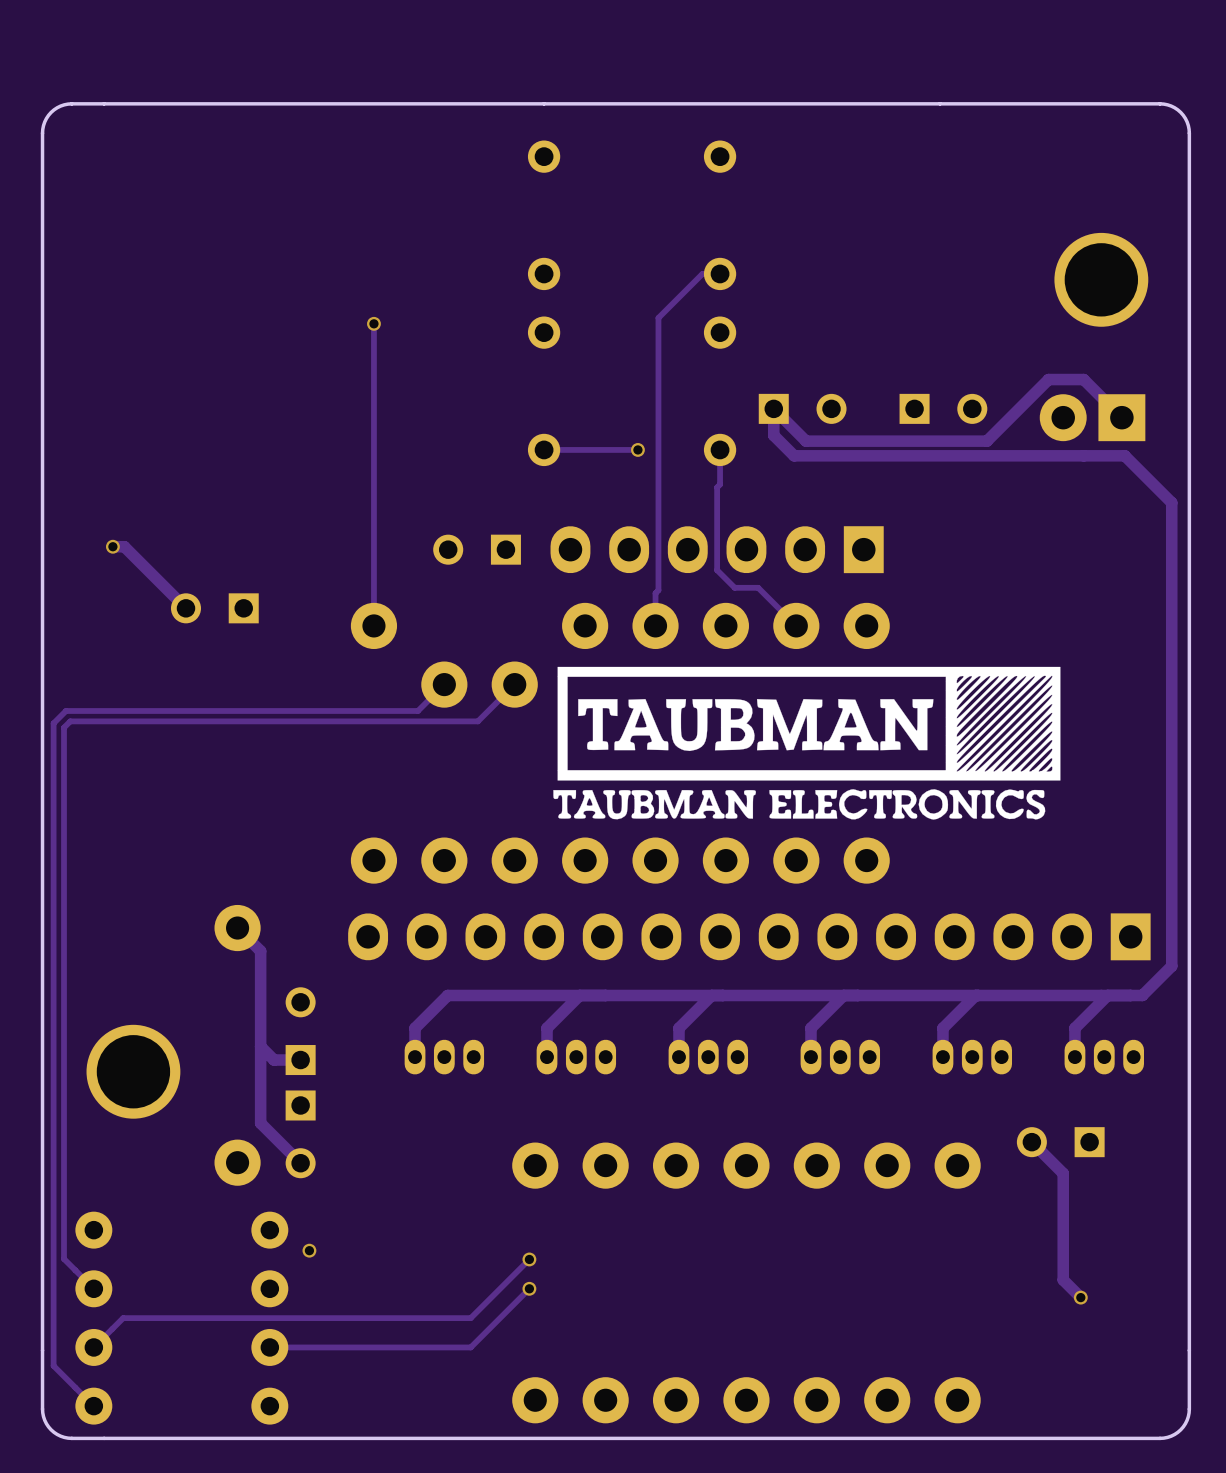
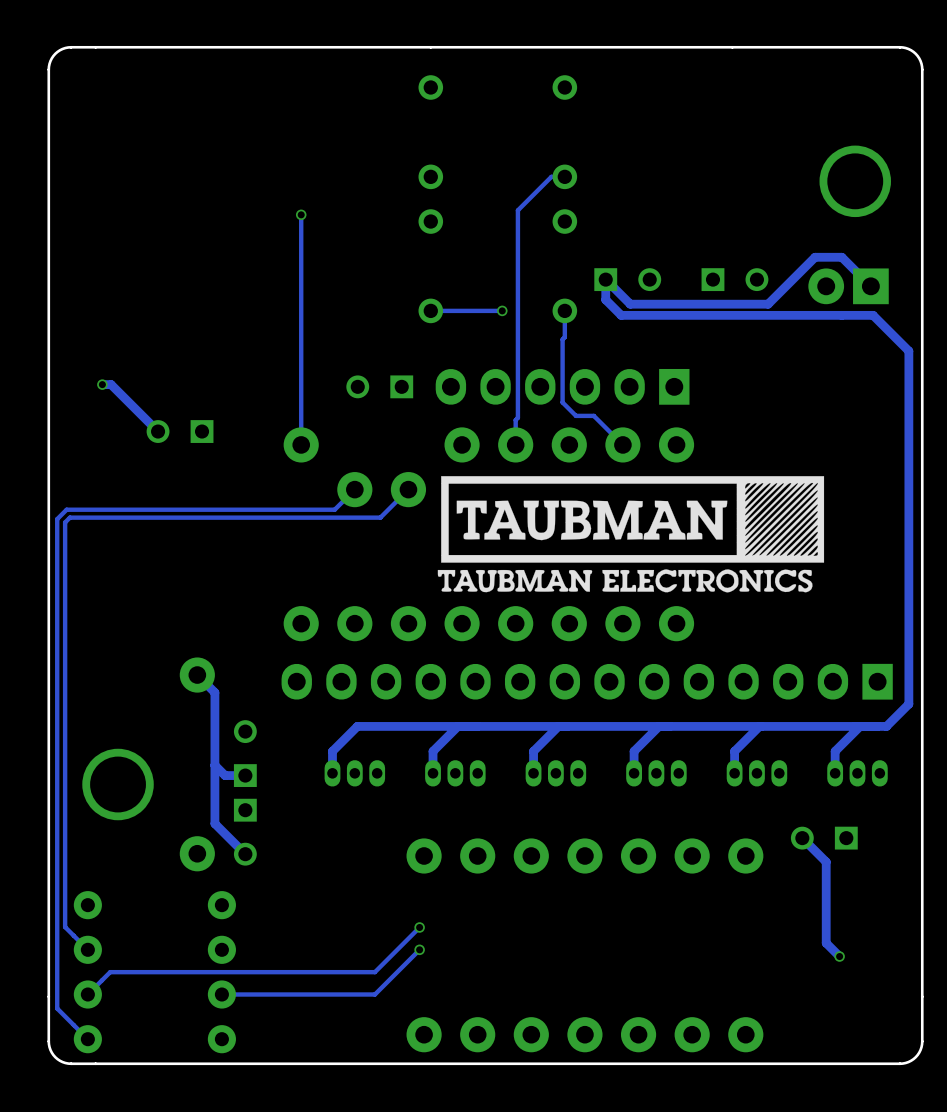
via: (309, 1250) -> none

